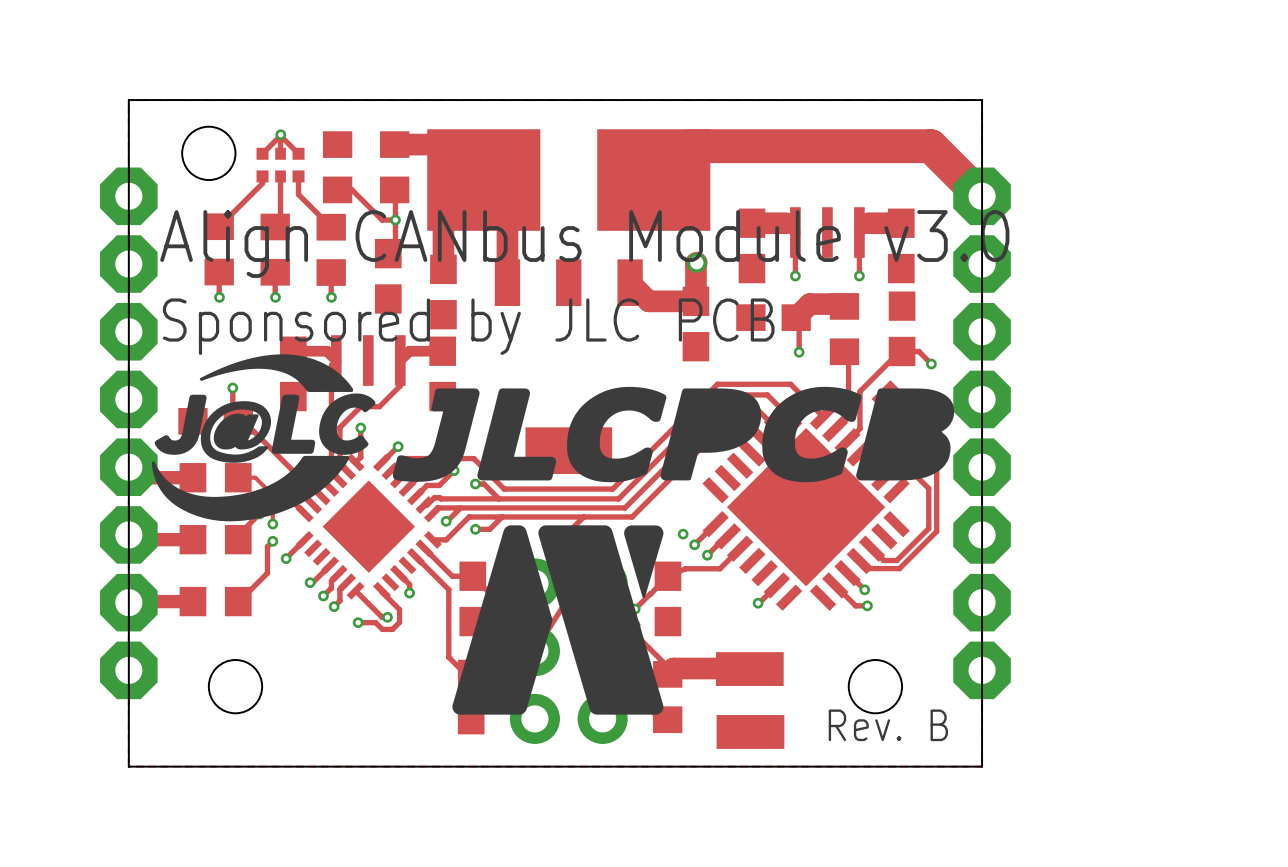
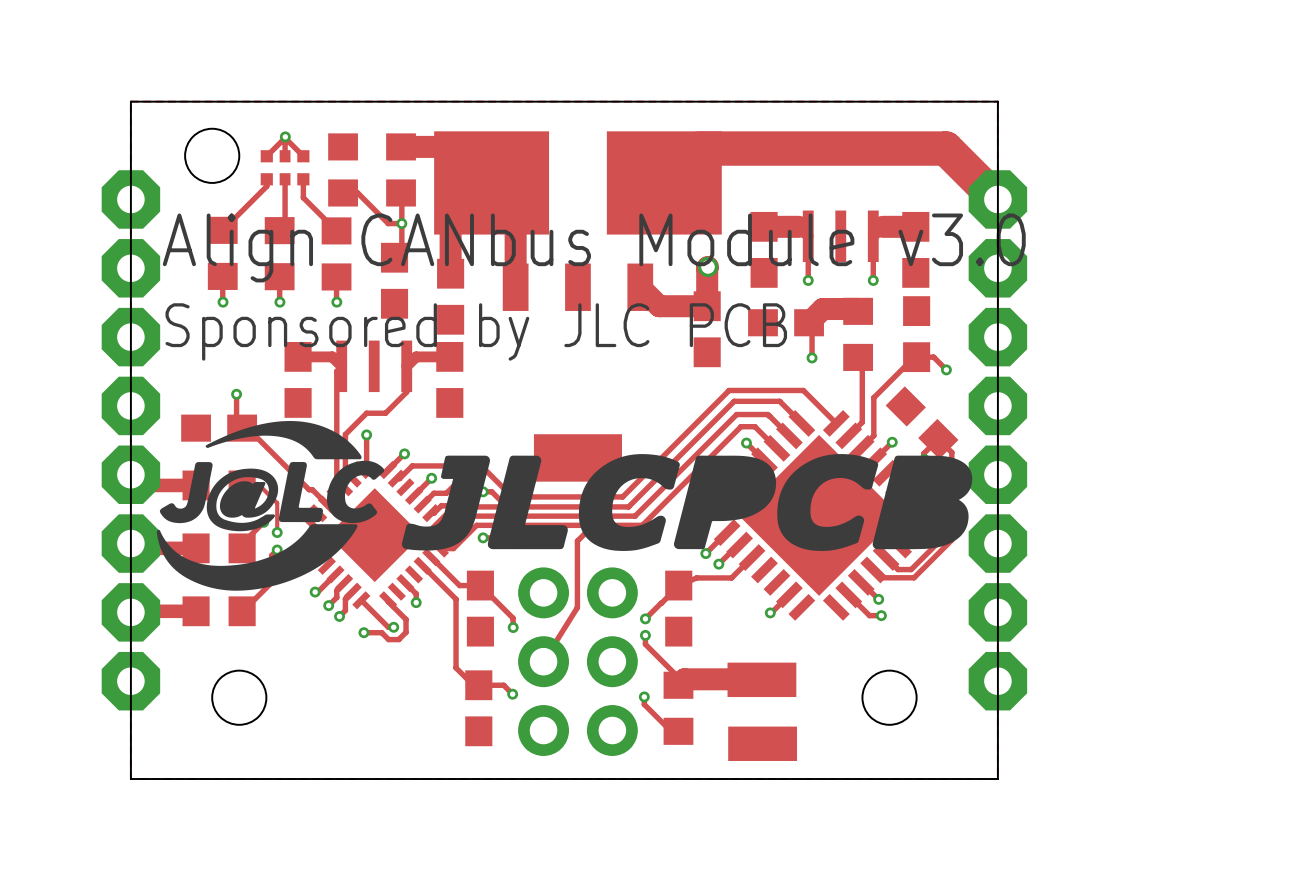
drawing position: (276, 373) -> (283, 440)
drawing position: (180, 424) -> (186, 492)
drawing position: (293, 424) -> (300, 492)
drawing position: (347, 424) -> (355, 491)
drawing position: (235, 431) -> (242, 499)
drawing position: (516, 434) -> (527, 502)
drawing position: (616, 434) -> (629, 502)
drawing position: (710, 434) -> (725, 502)
drawing position: (811, 434) -> (827, 502)
drawing position: (905, 434) -> (922, 502)
drawing position: (436, 435) -> (445, 503)
drawing position: (250, 488) -> (257, 557)
drawing: [452, 525, 664, 715] -> none
text: Rev. B (888, 725) -> none

